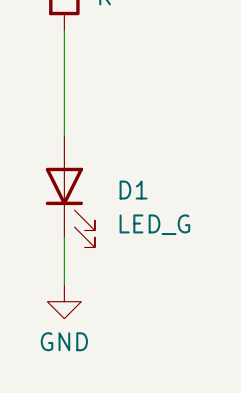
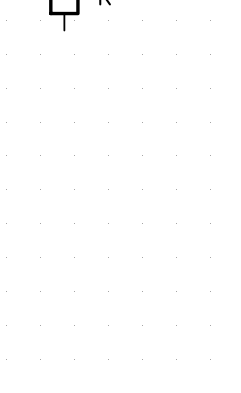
wire: (64, 30) (64, 135) -> none
D1: LED_G (70, 191) -> none
wire: (64, 237) (64, 284) -> none
power symbol: GND (64, 301) -> none

